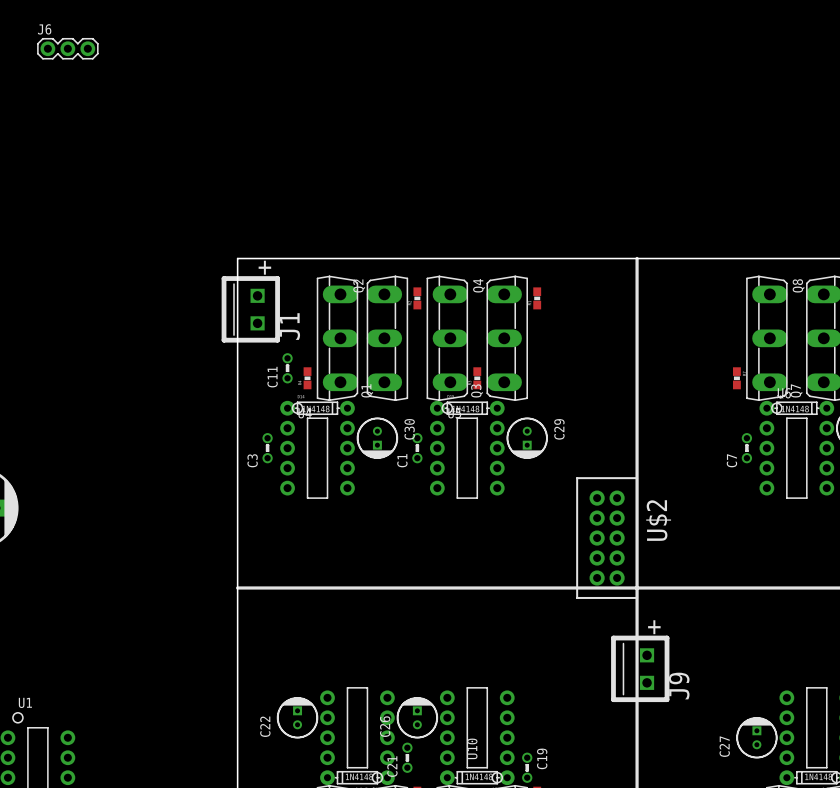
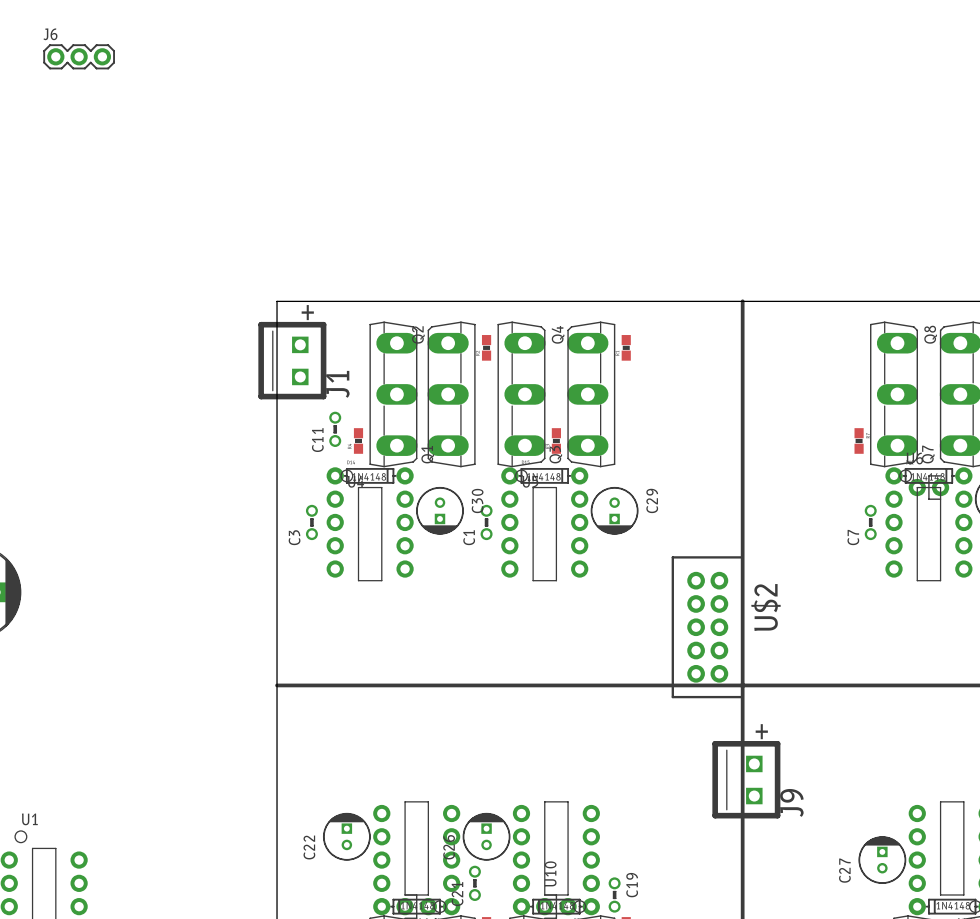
part: none -> (928, 487)
part: none -> (416, 906)
part: none -> (556, 906)

